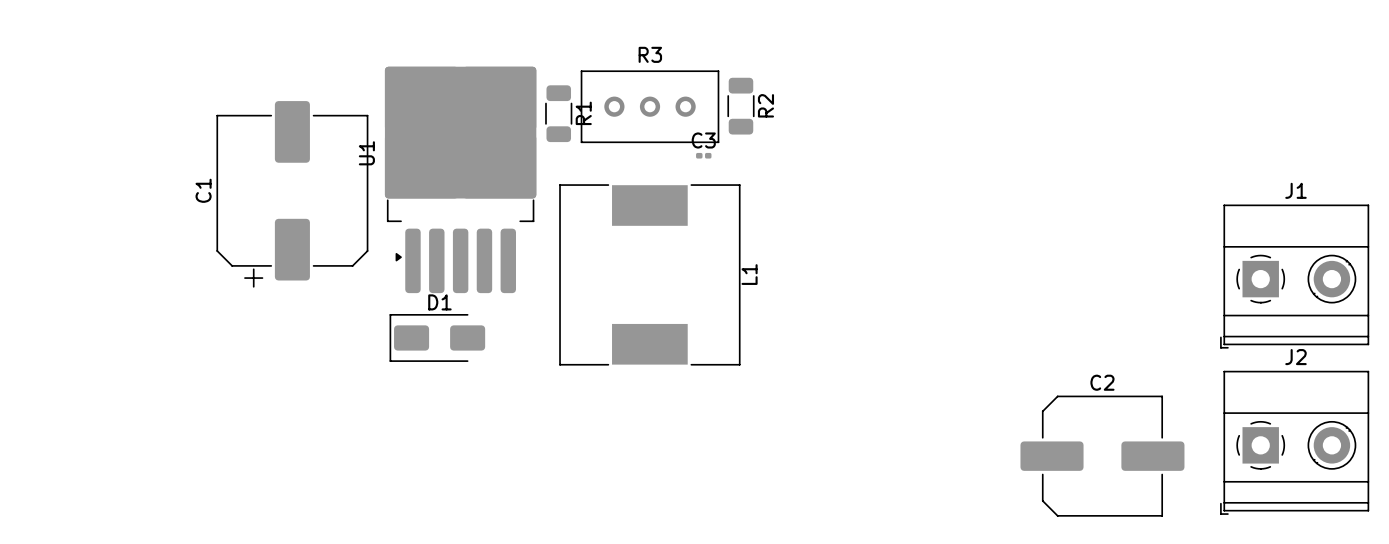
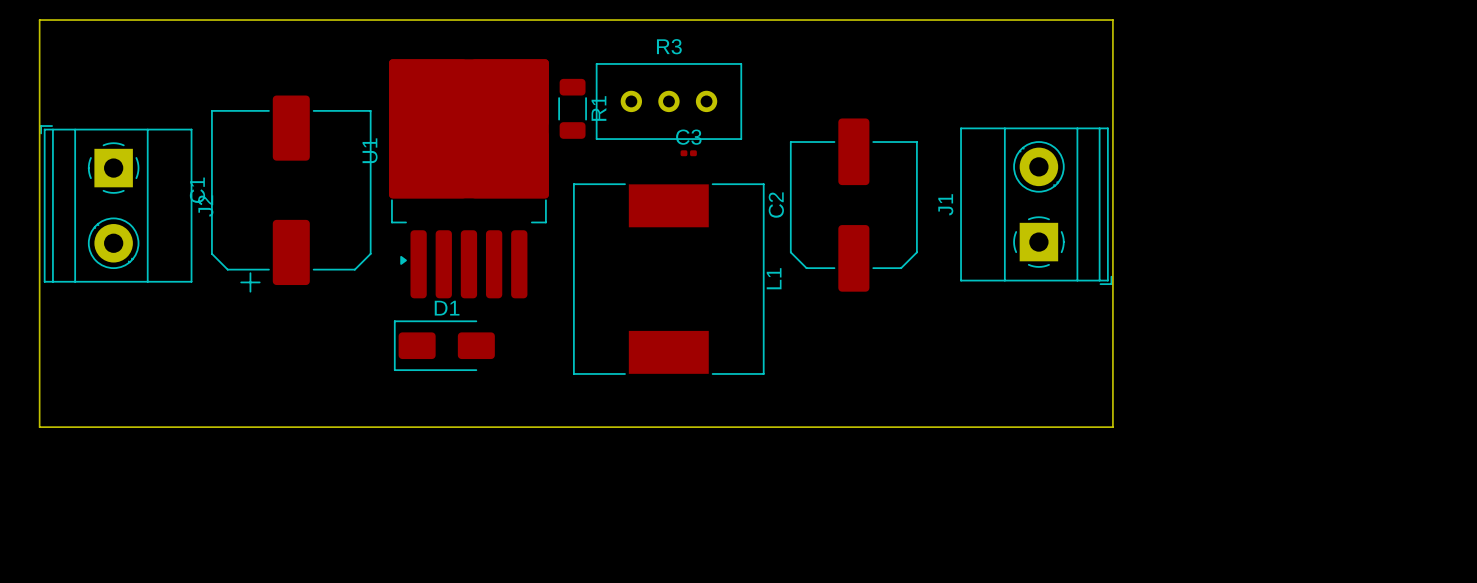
board edge: none -> (39, 20) (1112, 20) (1112, 427) (39, 427) (39, 20)
R2: (740, 106) -> none
C3 position: (703, 155) -> (688, 153)
J1 rotation: 0° (1294, 276) -> 90° counterclockwise (1036, 206)
J1 position: (1294, 276) -> (1036, 206)
J2 rotation: 0° (1294, 442) -> 90° clockwise (116, 203)
J2 position: (1294, 442) -> (116, 203)
C2 rotation: 0° (1102, 456) -> 90° counterclockwise (853, 205)
C2 position: (1102, 456) -> (853, 205)

